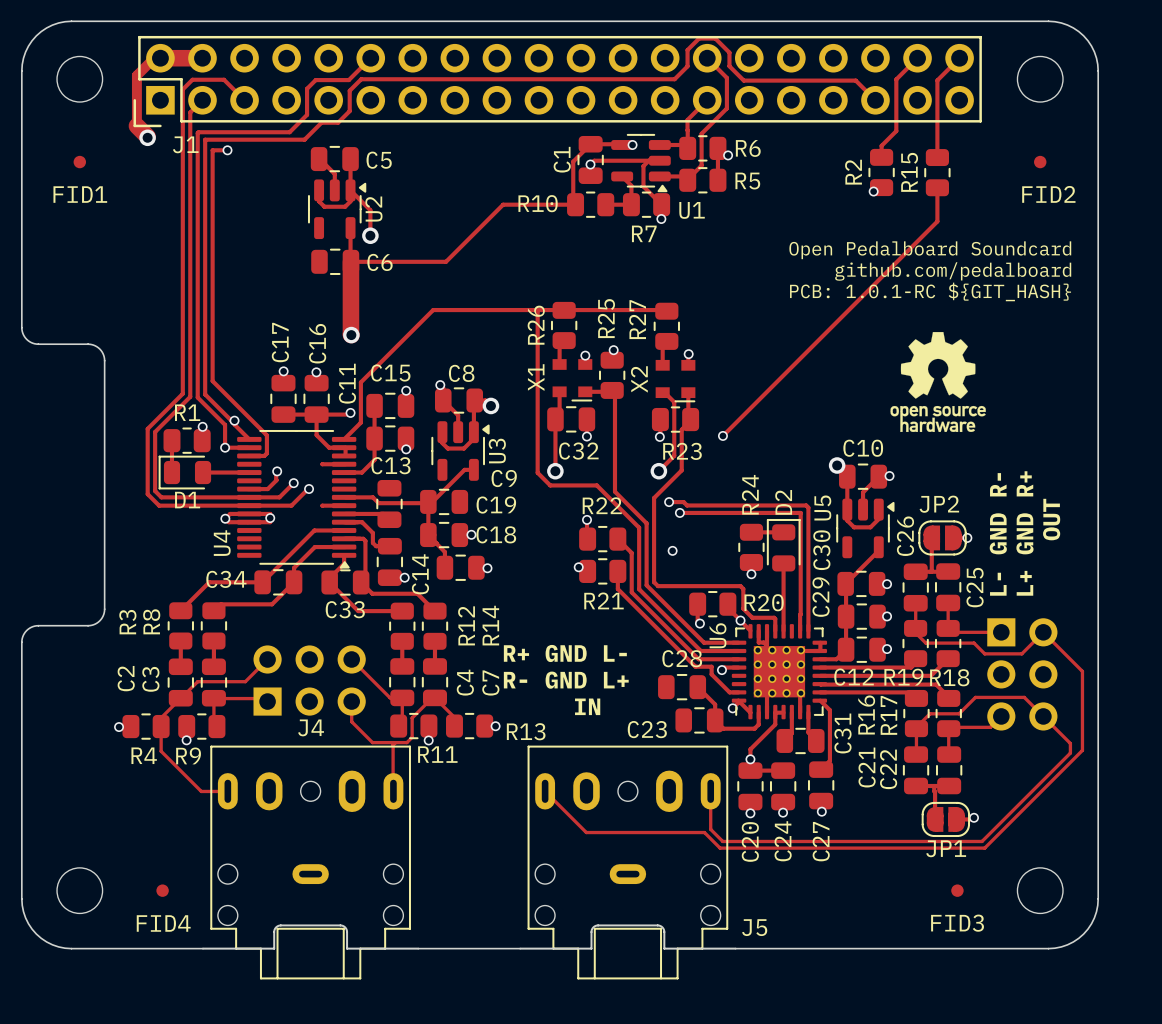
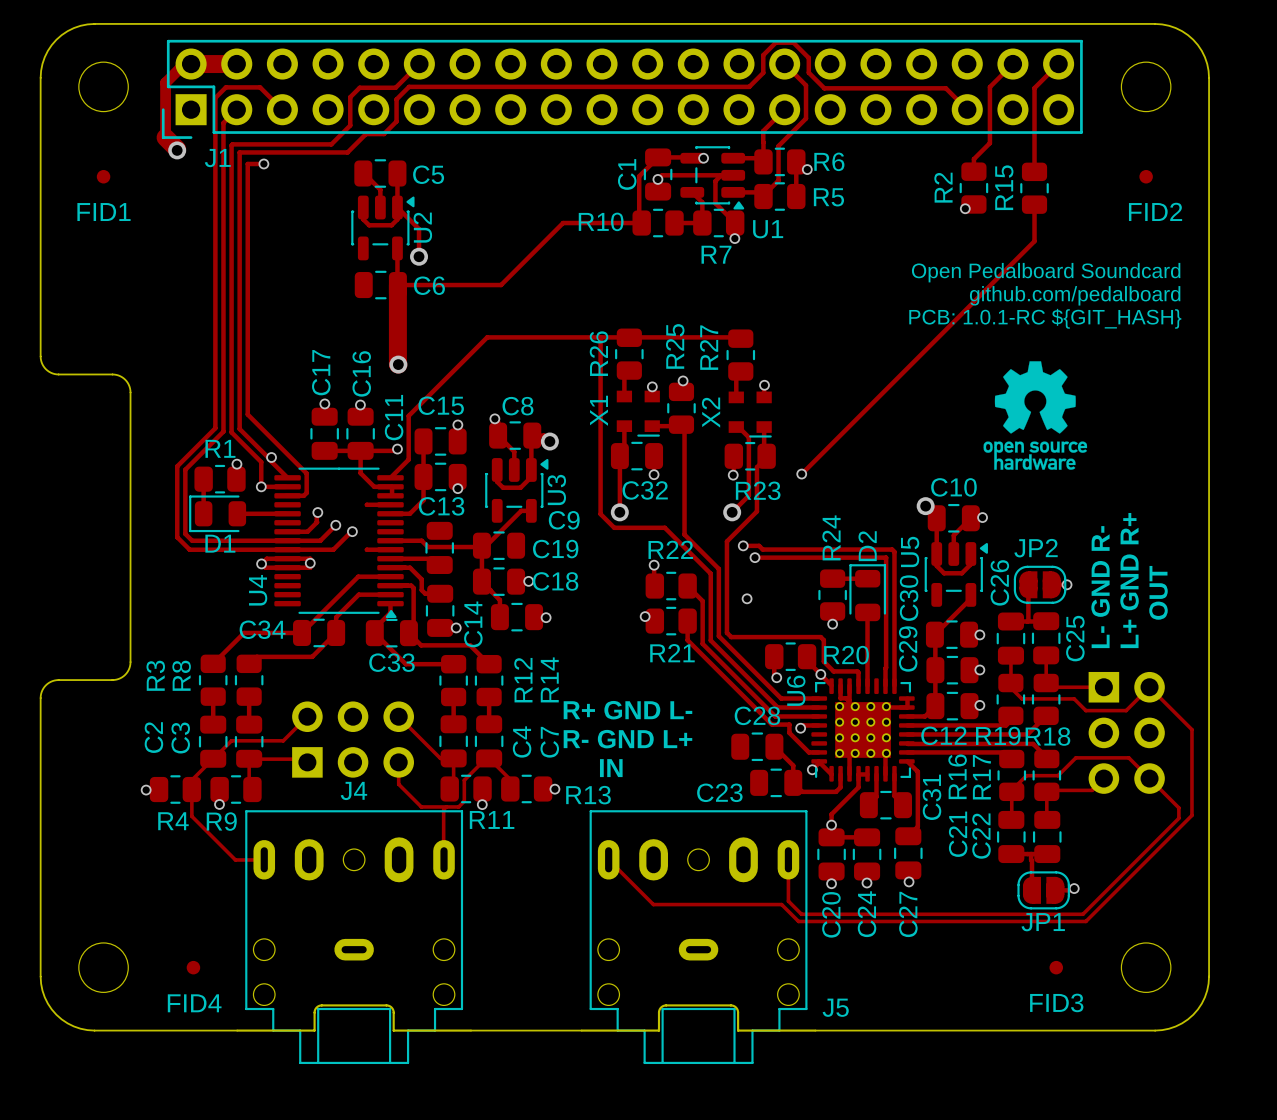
U1 footprint: [611, 133, 671, 193] -> [680, 146, 746, 210]
U2 footprint: [307, 179, 367, 240] -> [351, 195, 415, 261]
U3 footprint: [431, 421, 490, 481] -> [485, 458, 549, 523]
U5 footprint: [836, 498, 895, 559] -> [924, 542, 988, 607]

